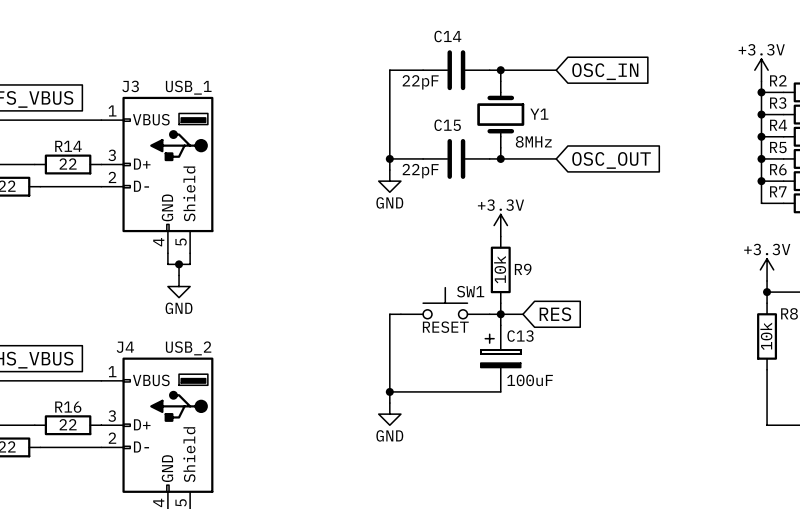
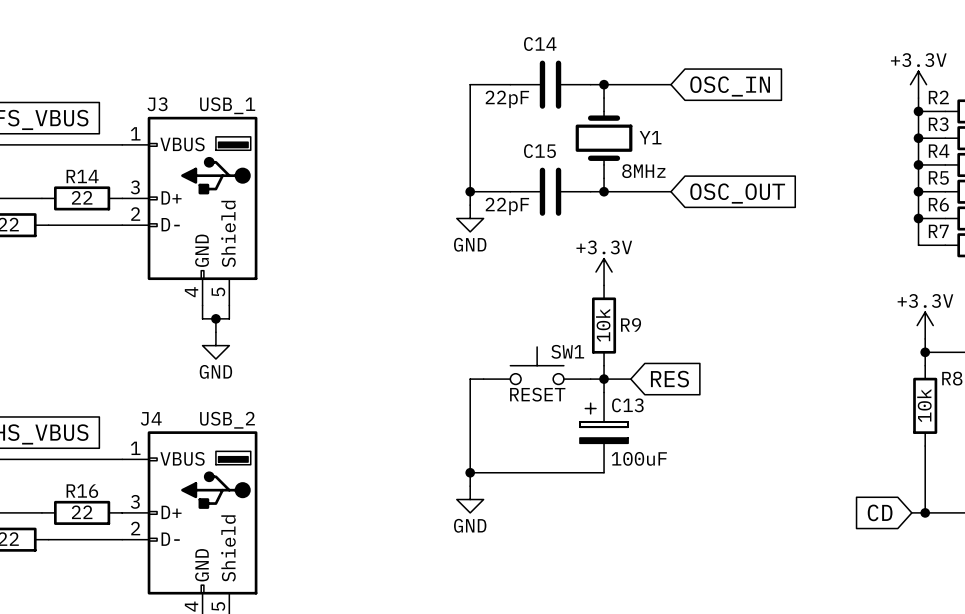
global label: none -> CD (880, 512)
wire: none -> (911, 512) (925, 512)
junction: none -> (925, 512)

